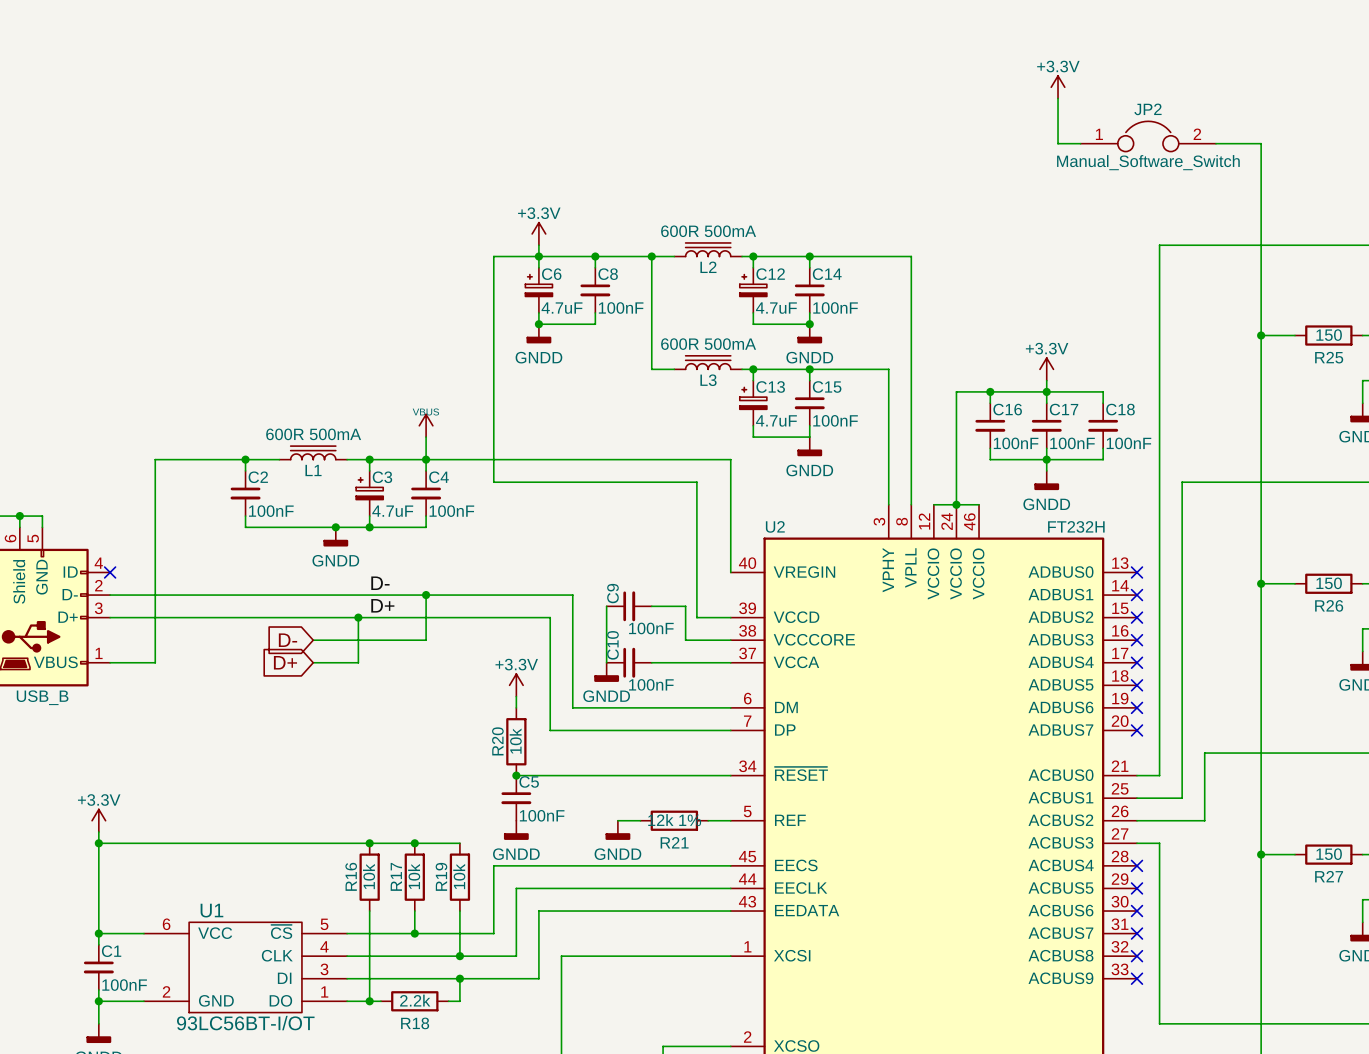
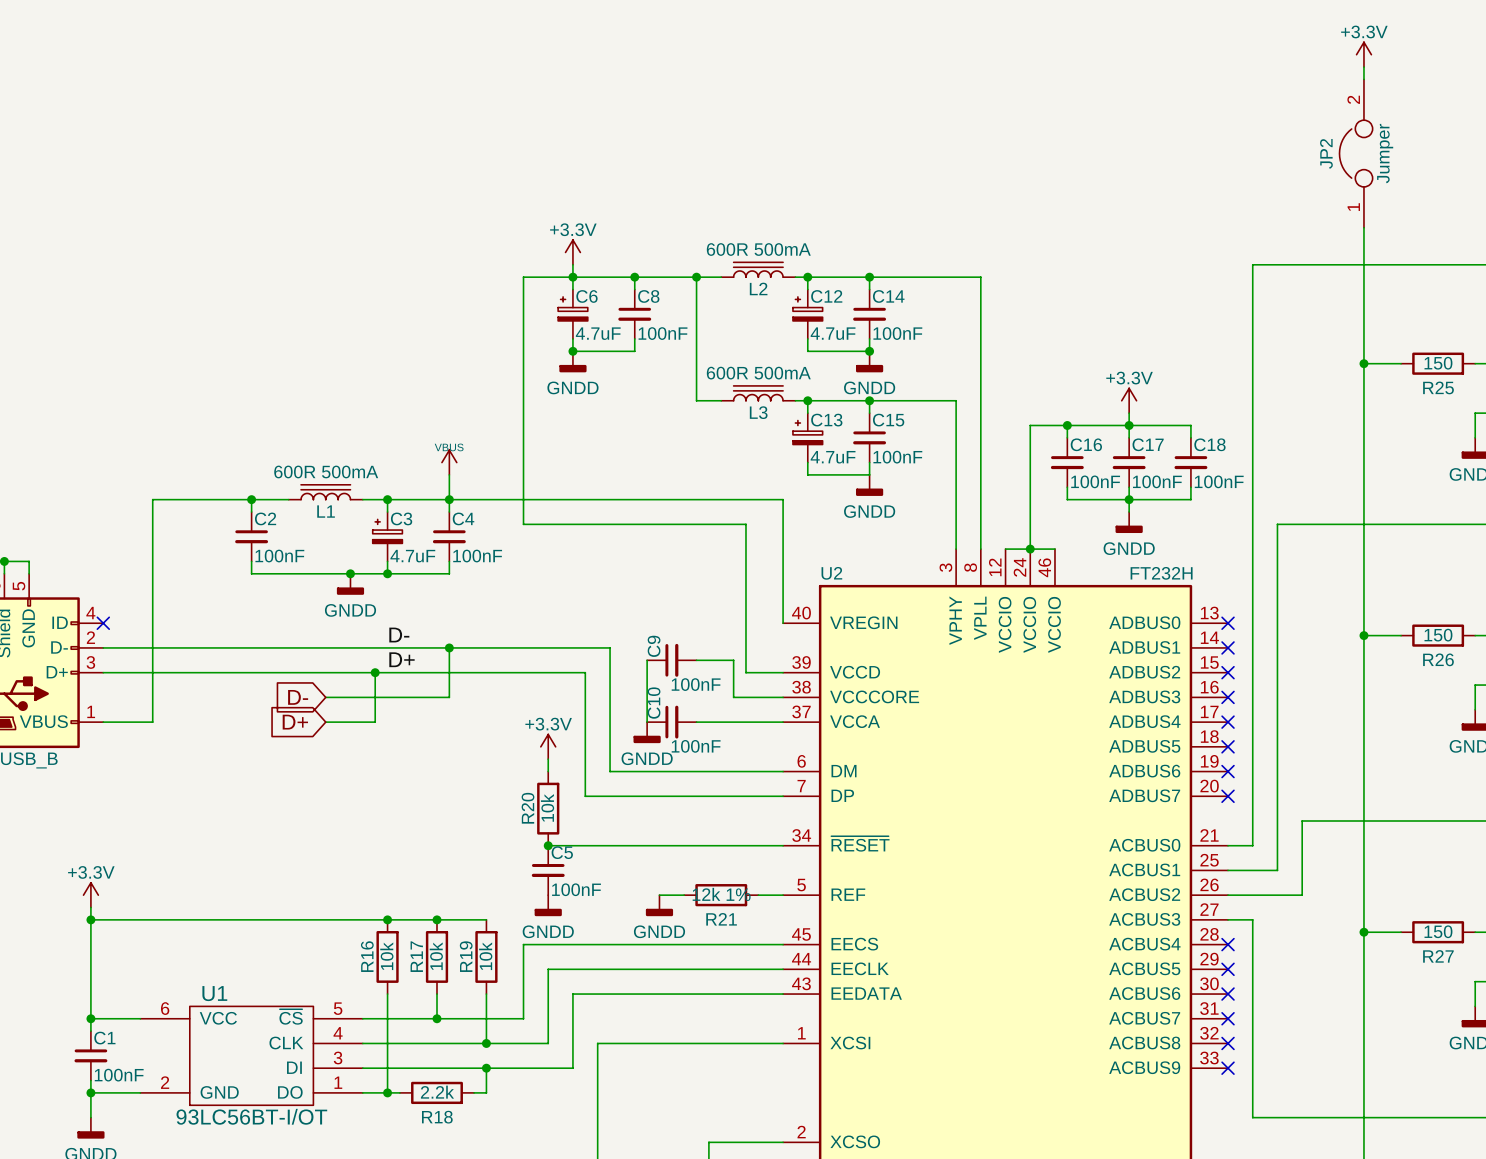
wire: none -> (1363, 67) (1363, 79)
power symbol position: +3.3V (1058, 87) -> +3.3V (1363, 54)
wire: (1058, 98) (1058, 143) (1080, 143) -> none
JP2 rotation: 0° (1148, 136) -> 90° counterclockwise (1356, 153)
JP2 position: (1148, 136) -> (1356, 153)
wire: (1215, 143) (1261, 143) (1261, 211) -> none
JP2 value: Manual_Software_Switch (1148, 162) -> Jumper (1385, 153)

